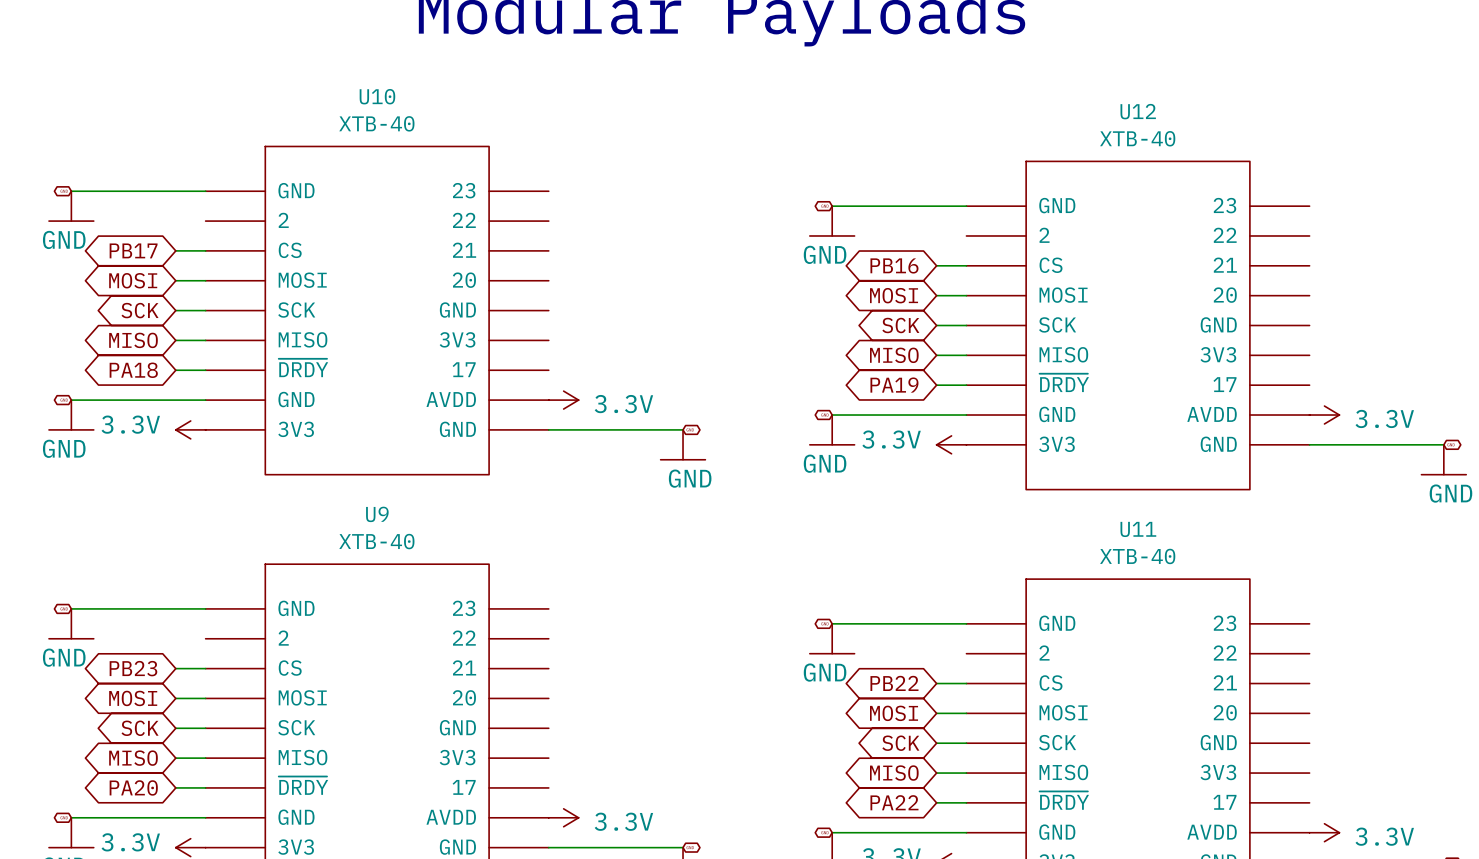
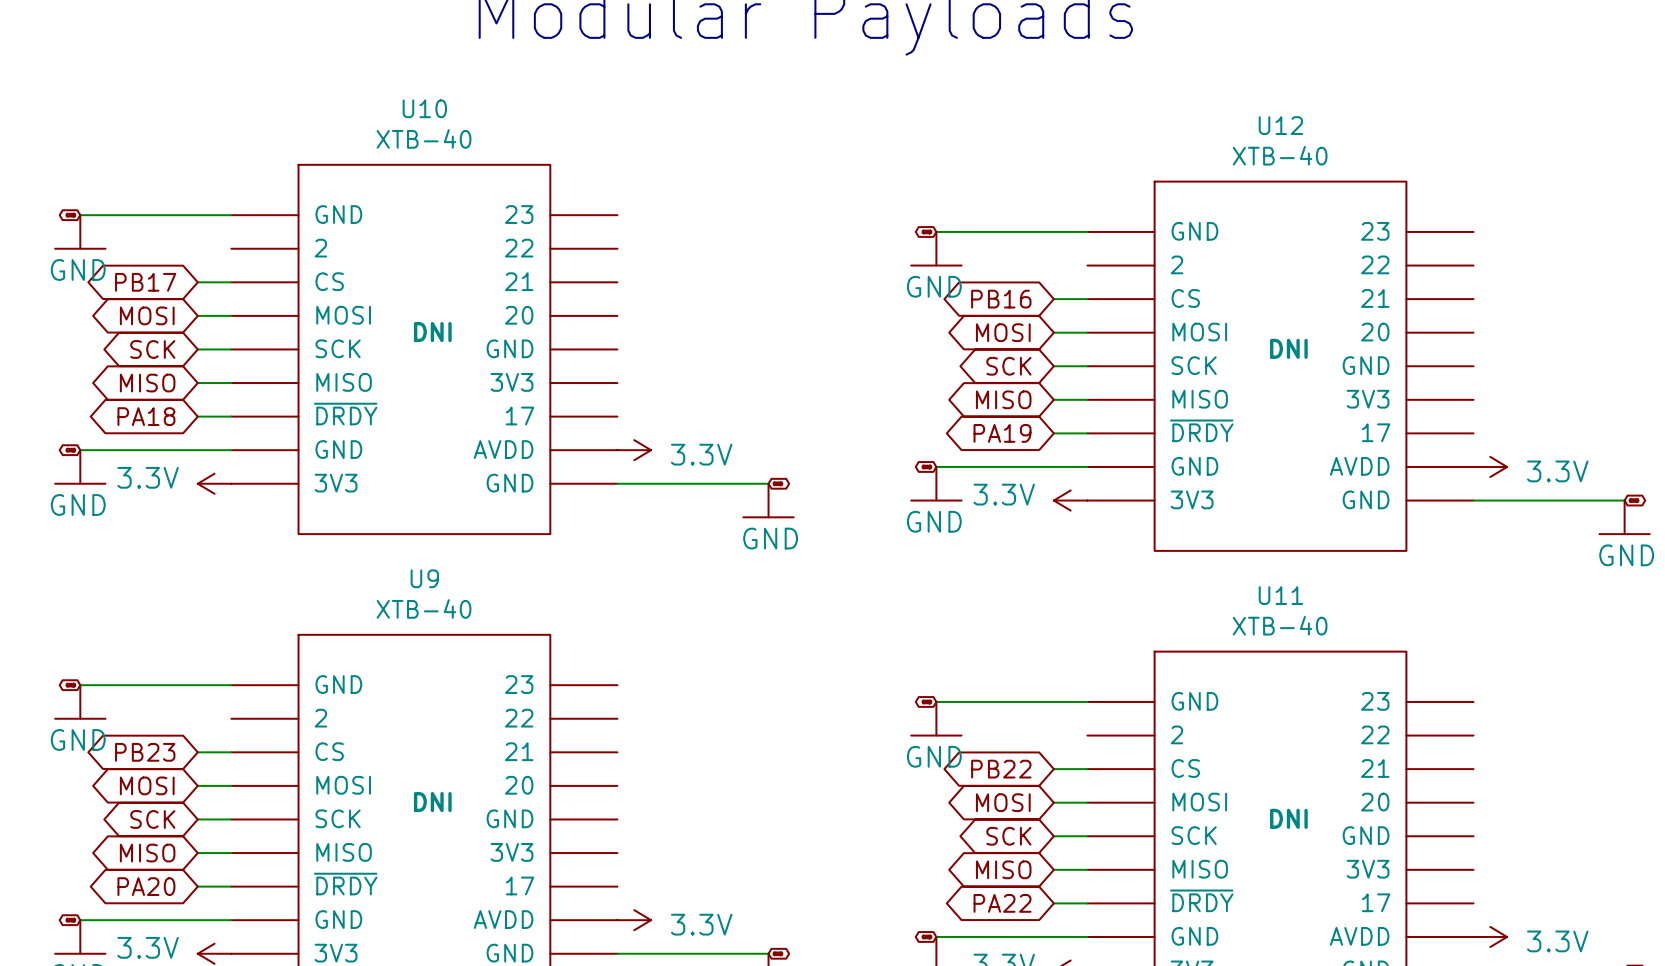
U10 text: none -> DNI (432, 332)
U12 text: none -> DNI (1288, 348)
U9 text: none -> DNI (432, 802)
U11 text: none -> DNI (1288, 818)

